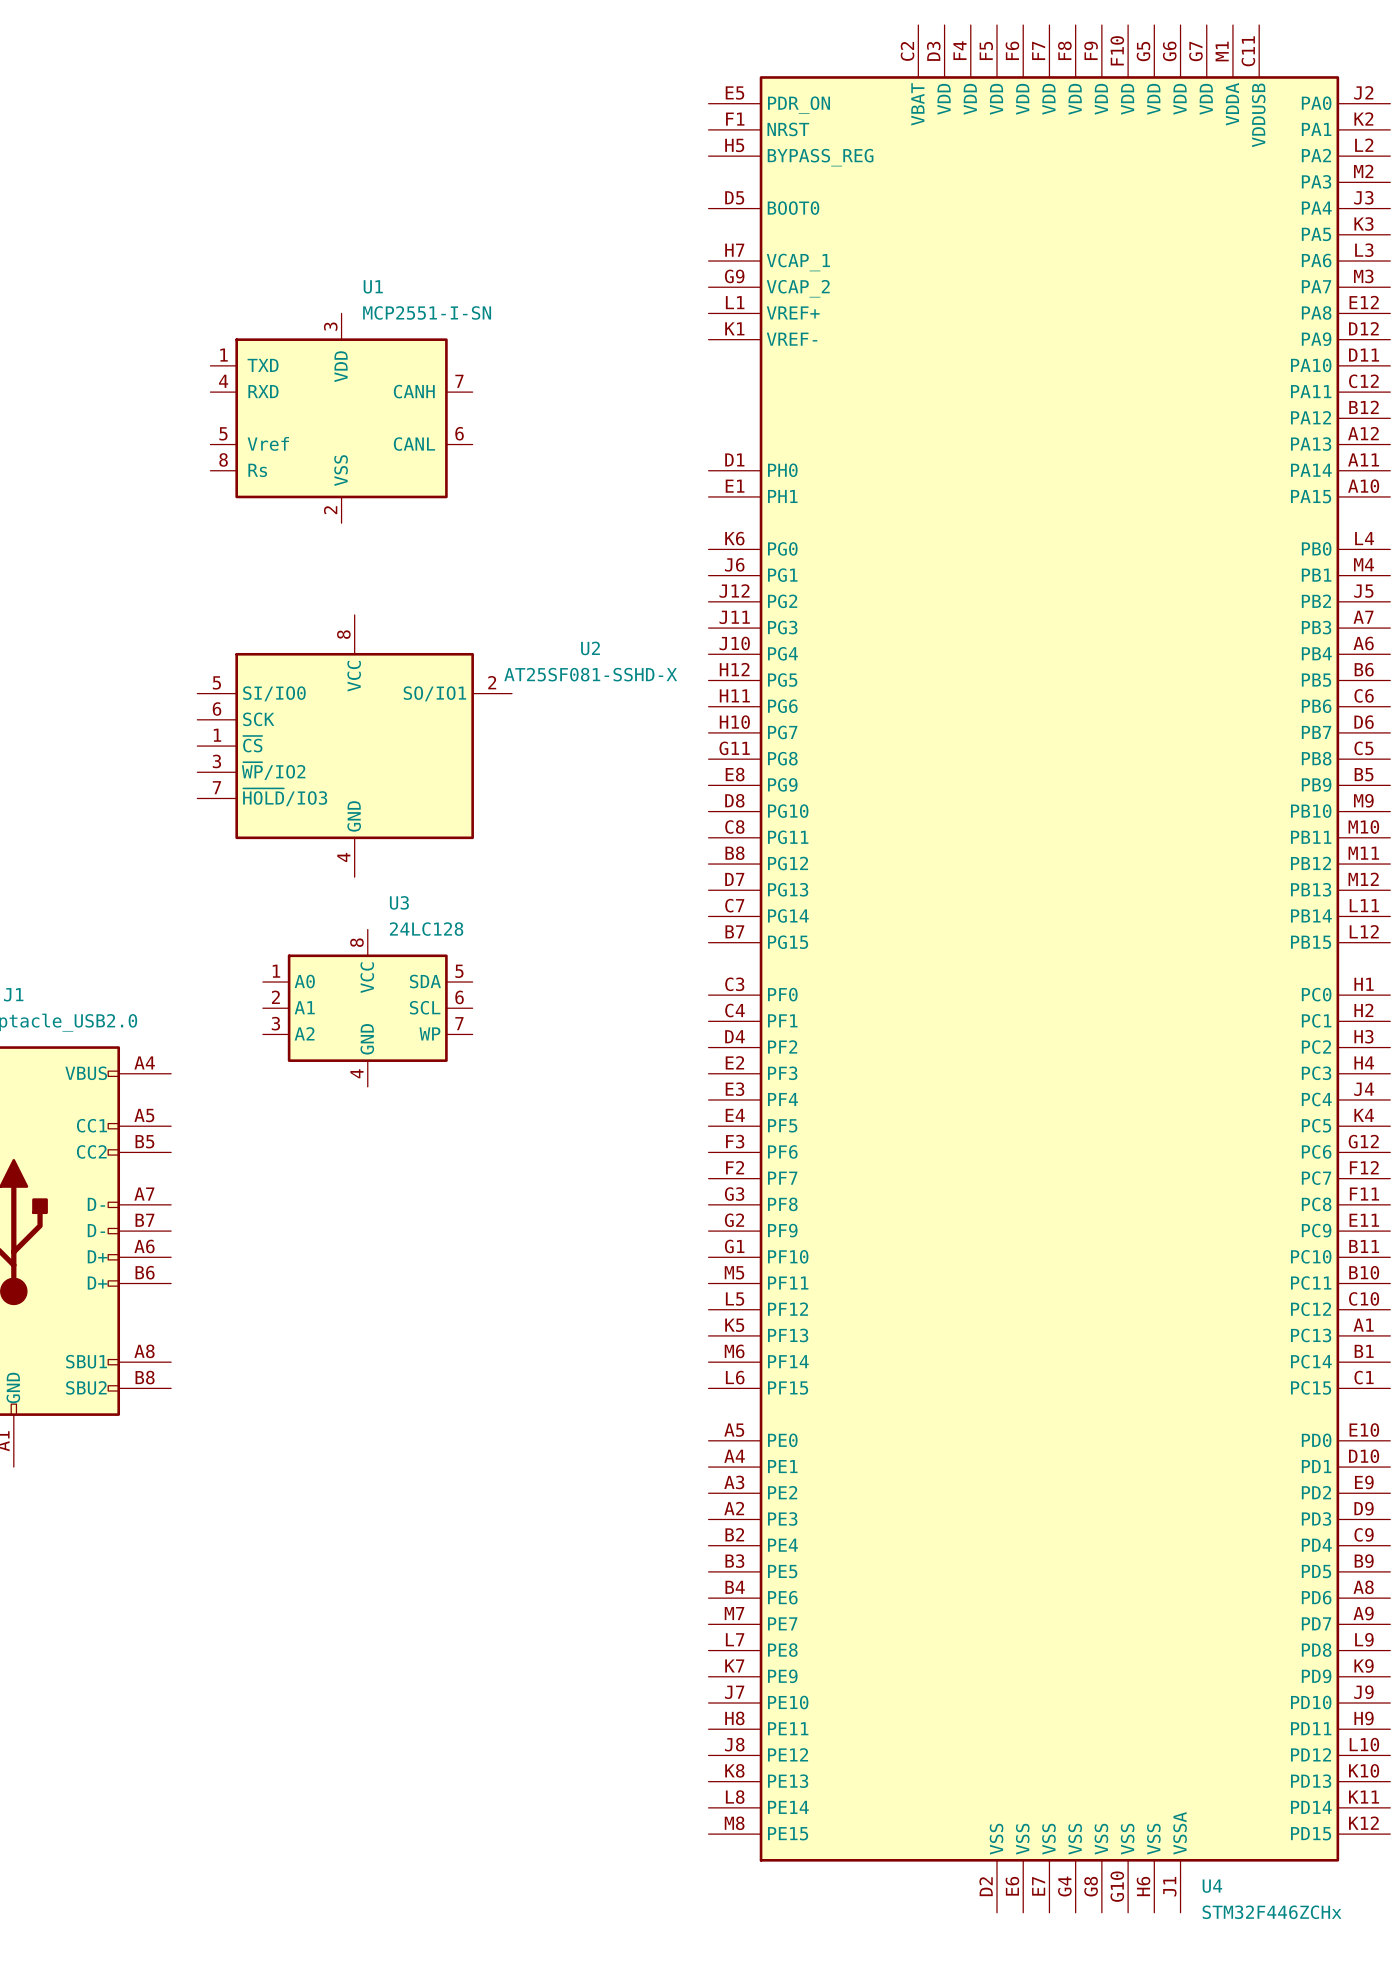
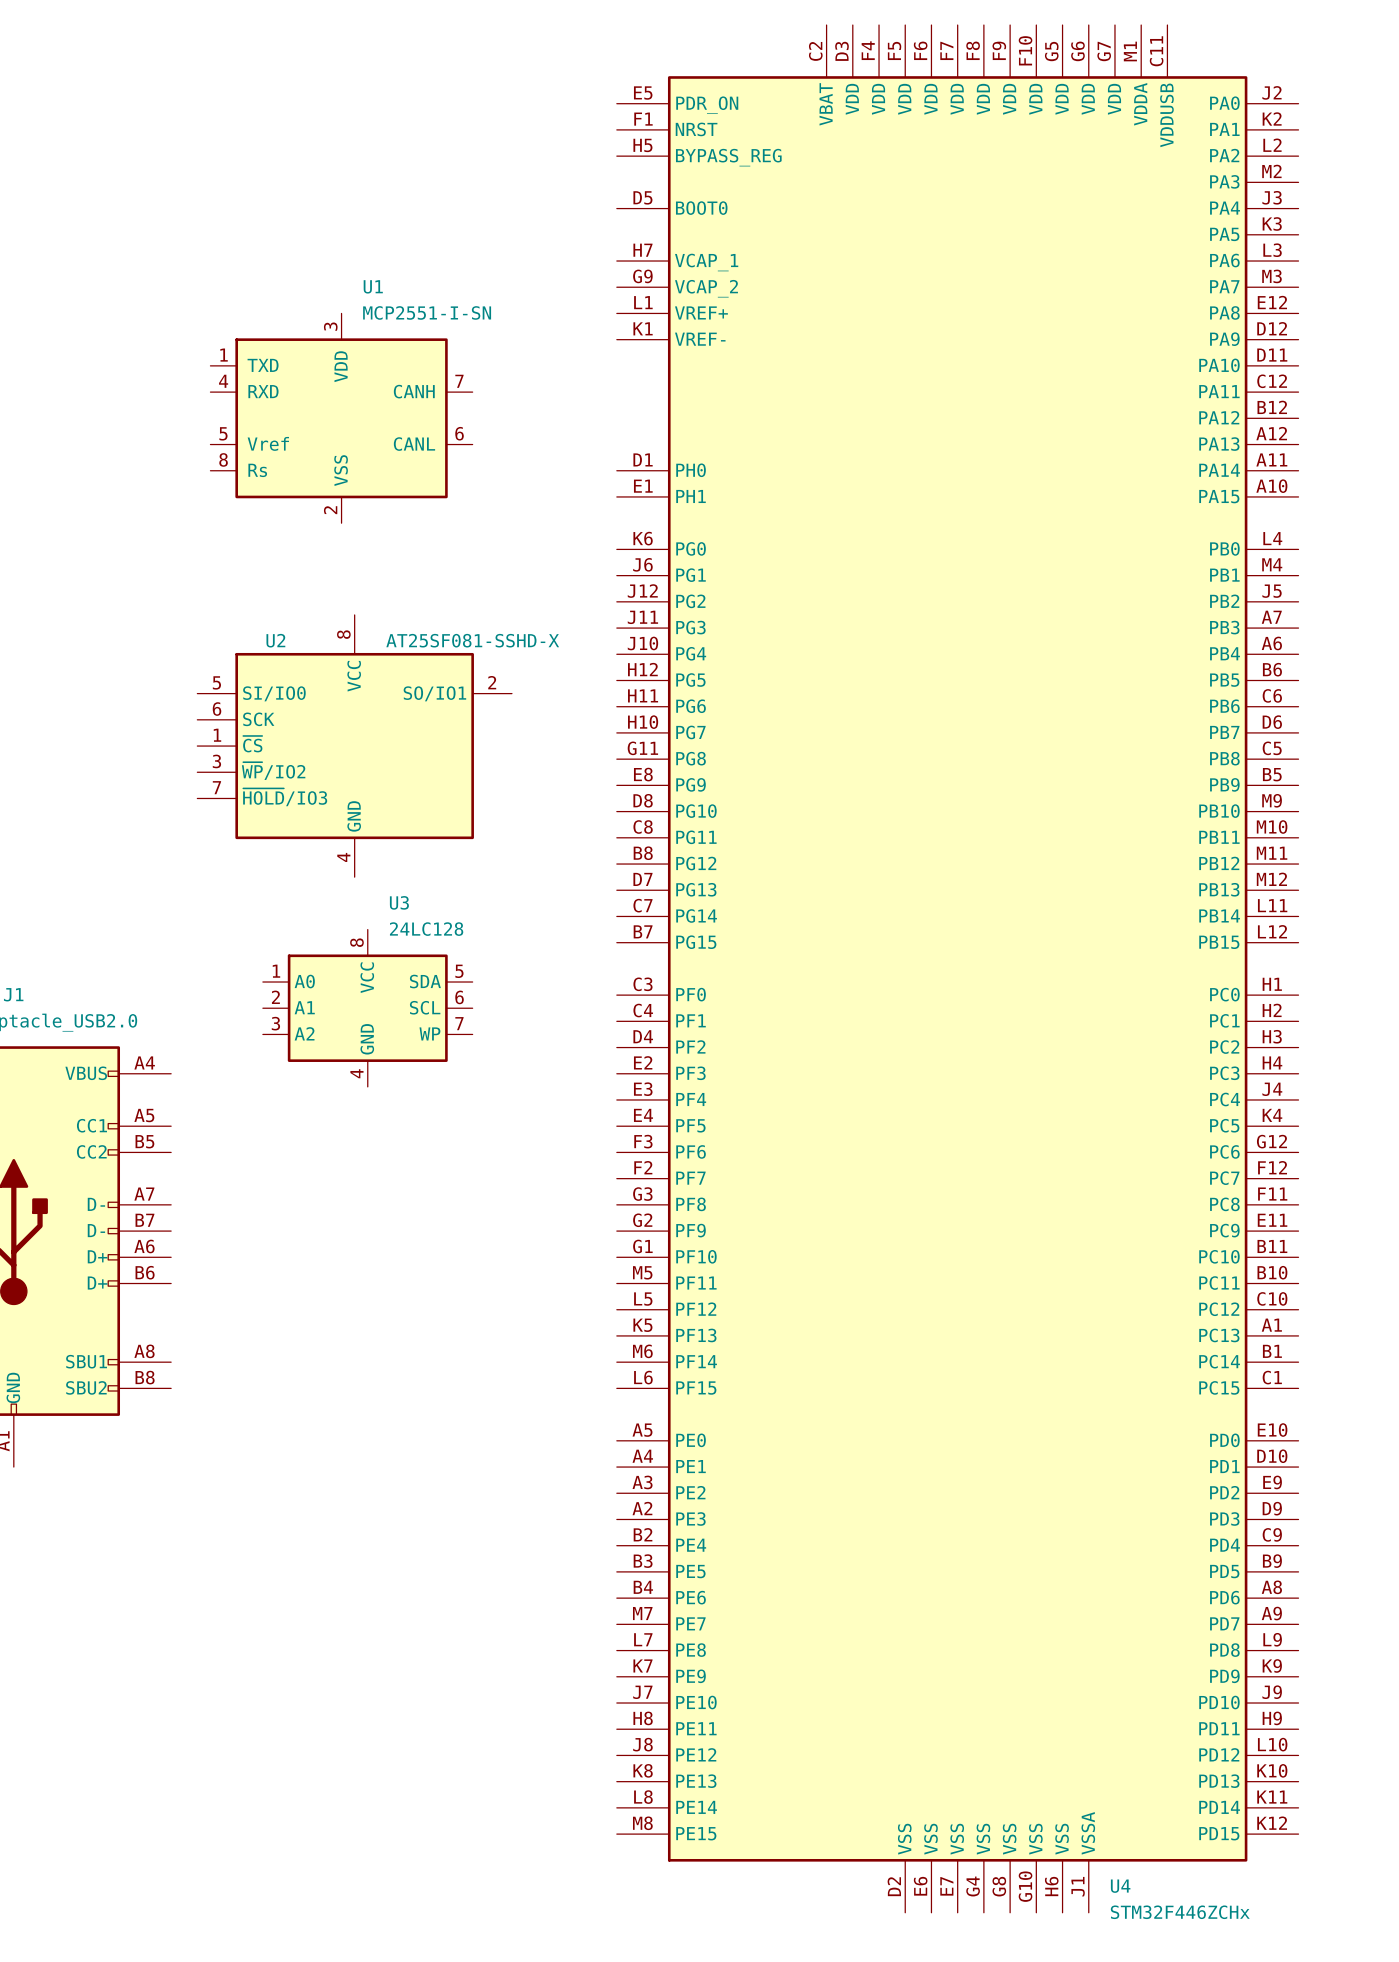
U2 name position: U2 (590, 648) -> U2 (275, 640)
U2 value position: AT25SF081-SSHD-X (590, 674) -> AT25SF081-SSHD-X (472, 640)
U4 position: (1049, 968) -> (957, 968)

